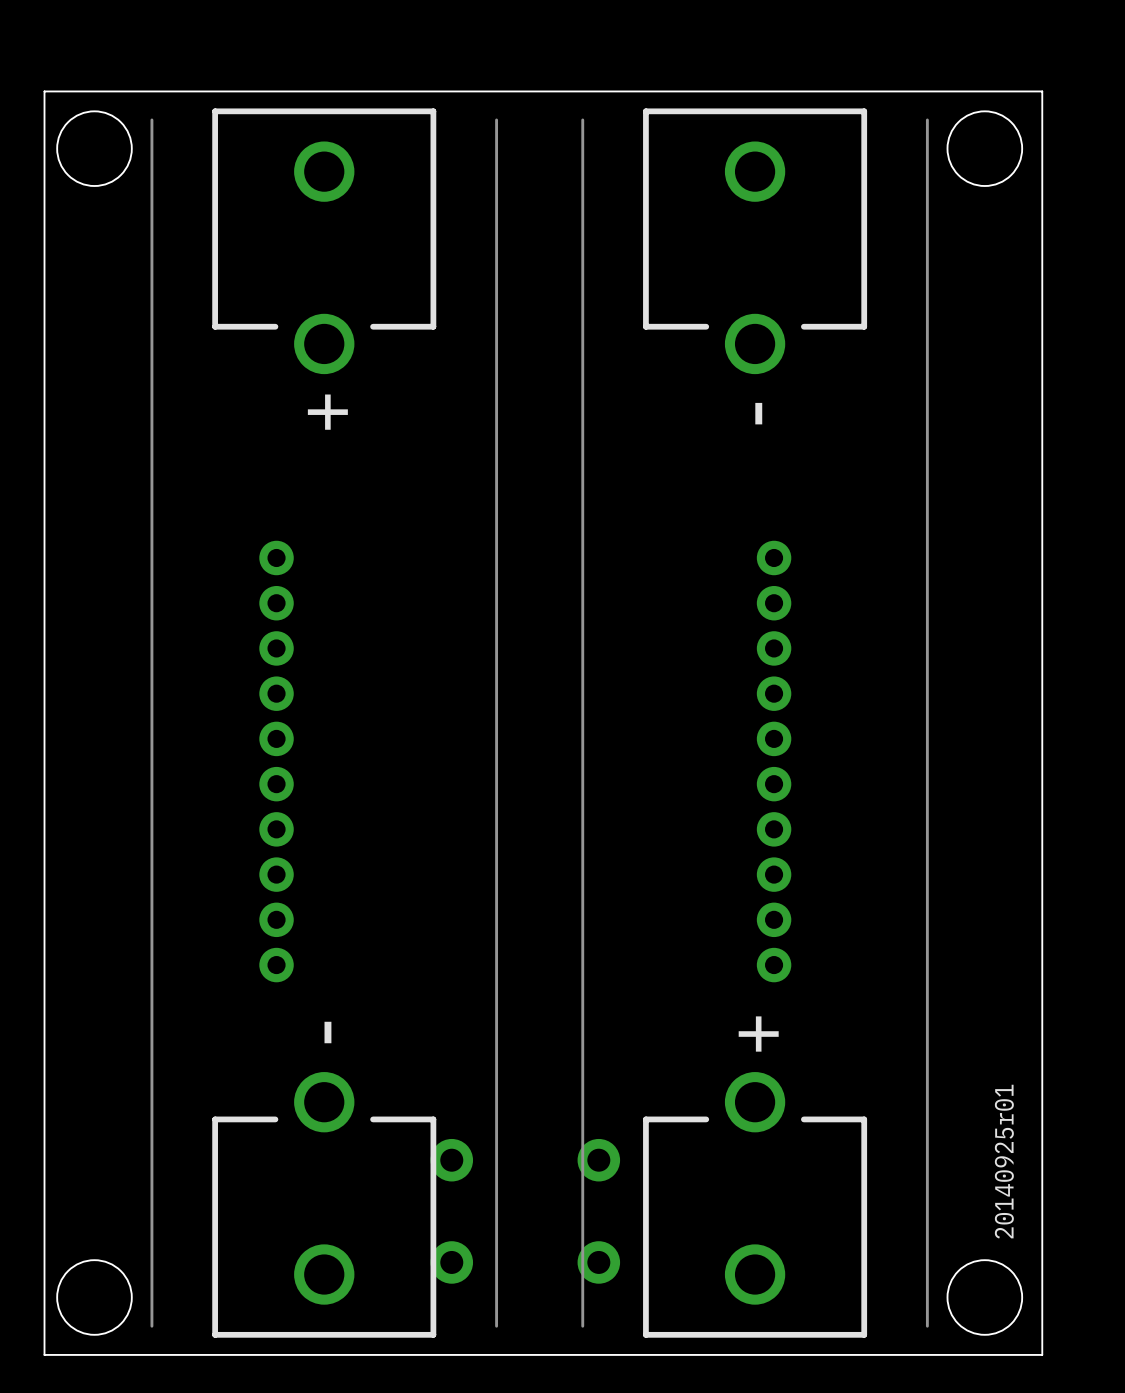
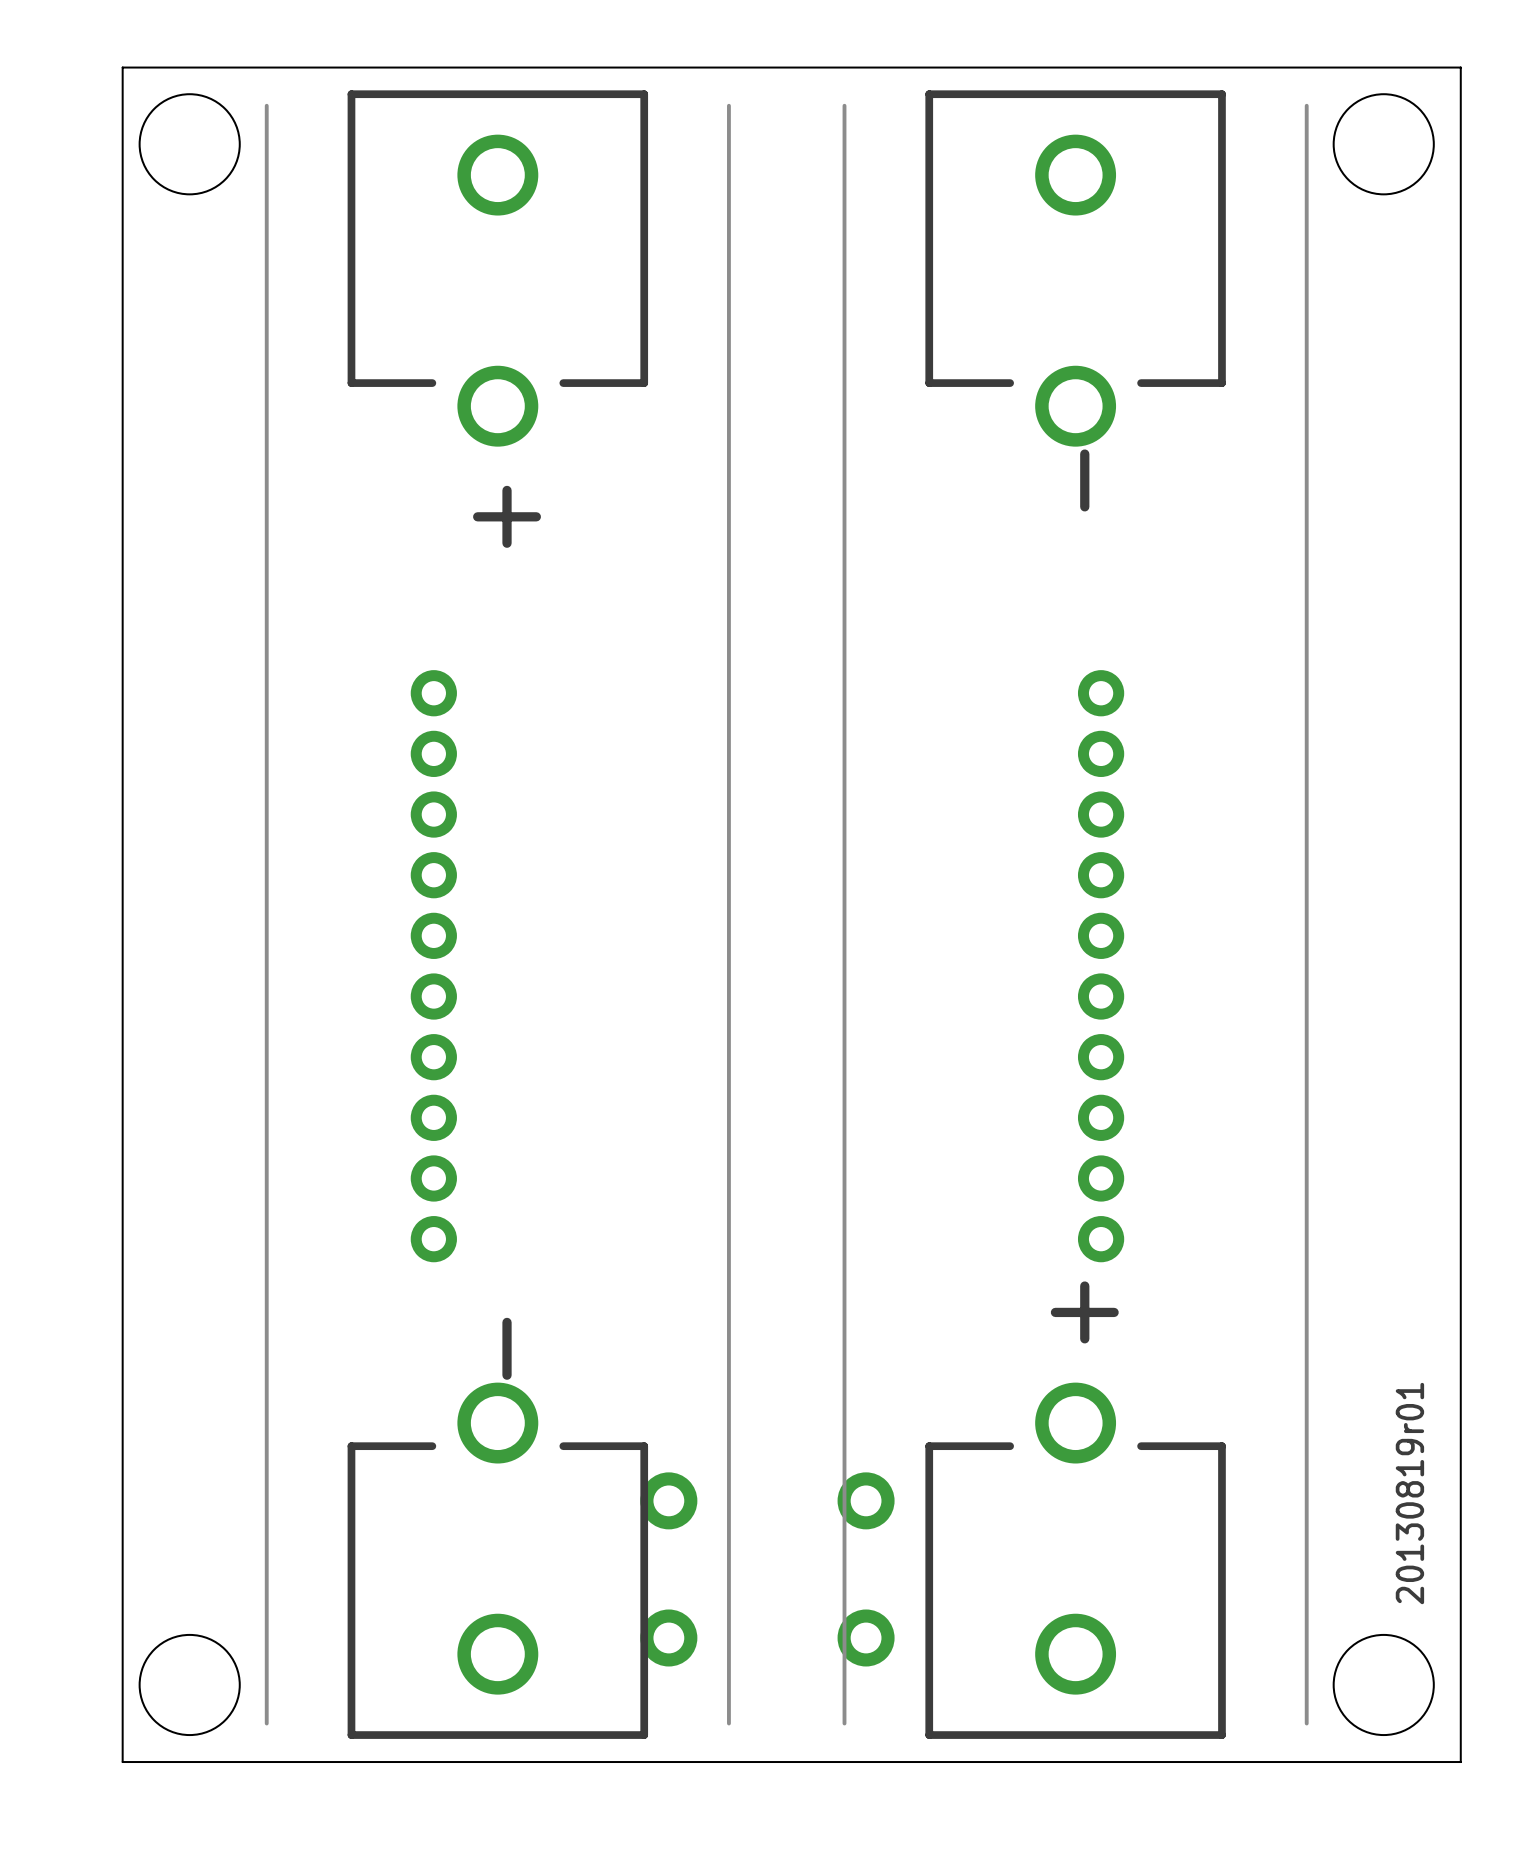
text: 20140925r01 (1004, 1161) -> 20130819r01 (1409, 1493)

